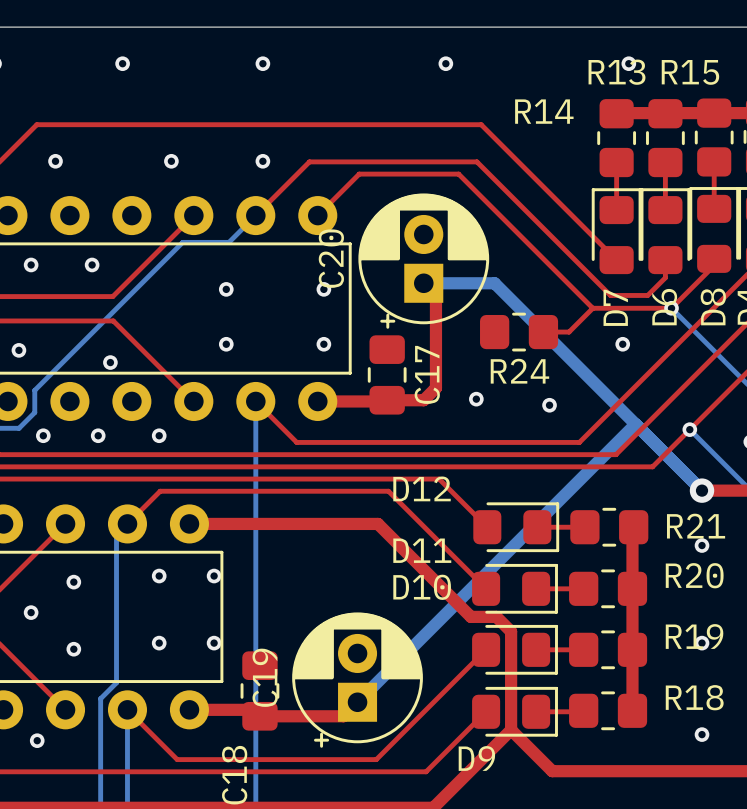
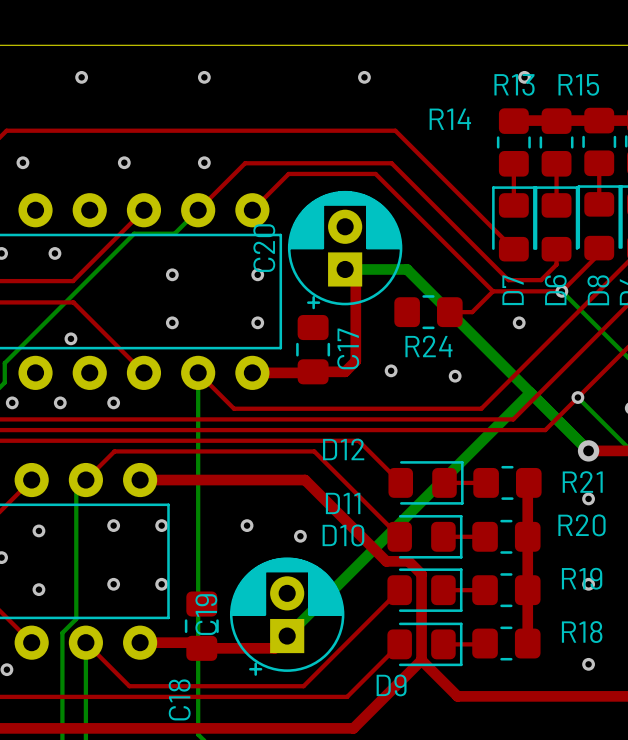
via: none -> (247, 525)
via: none -> (300, 536)

